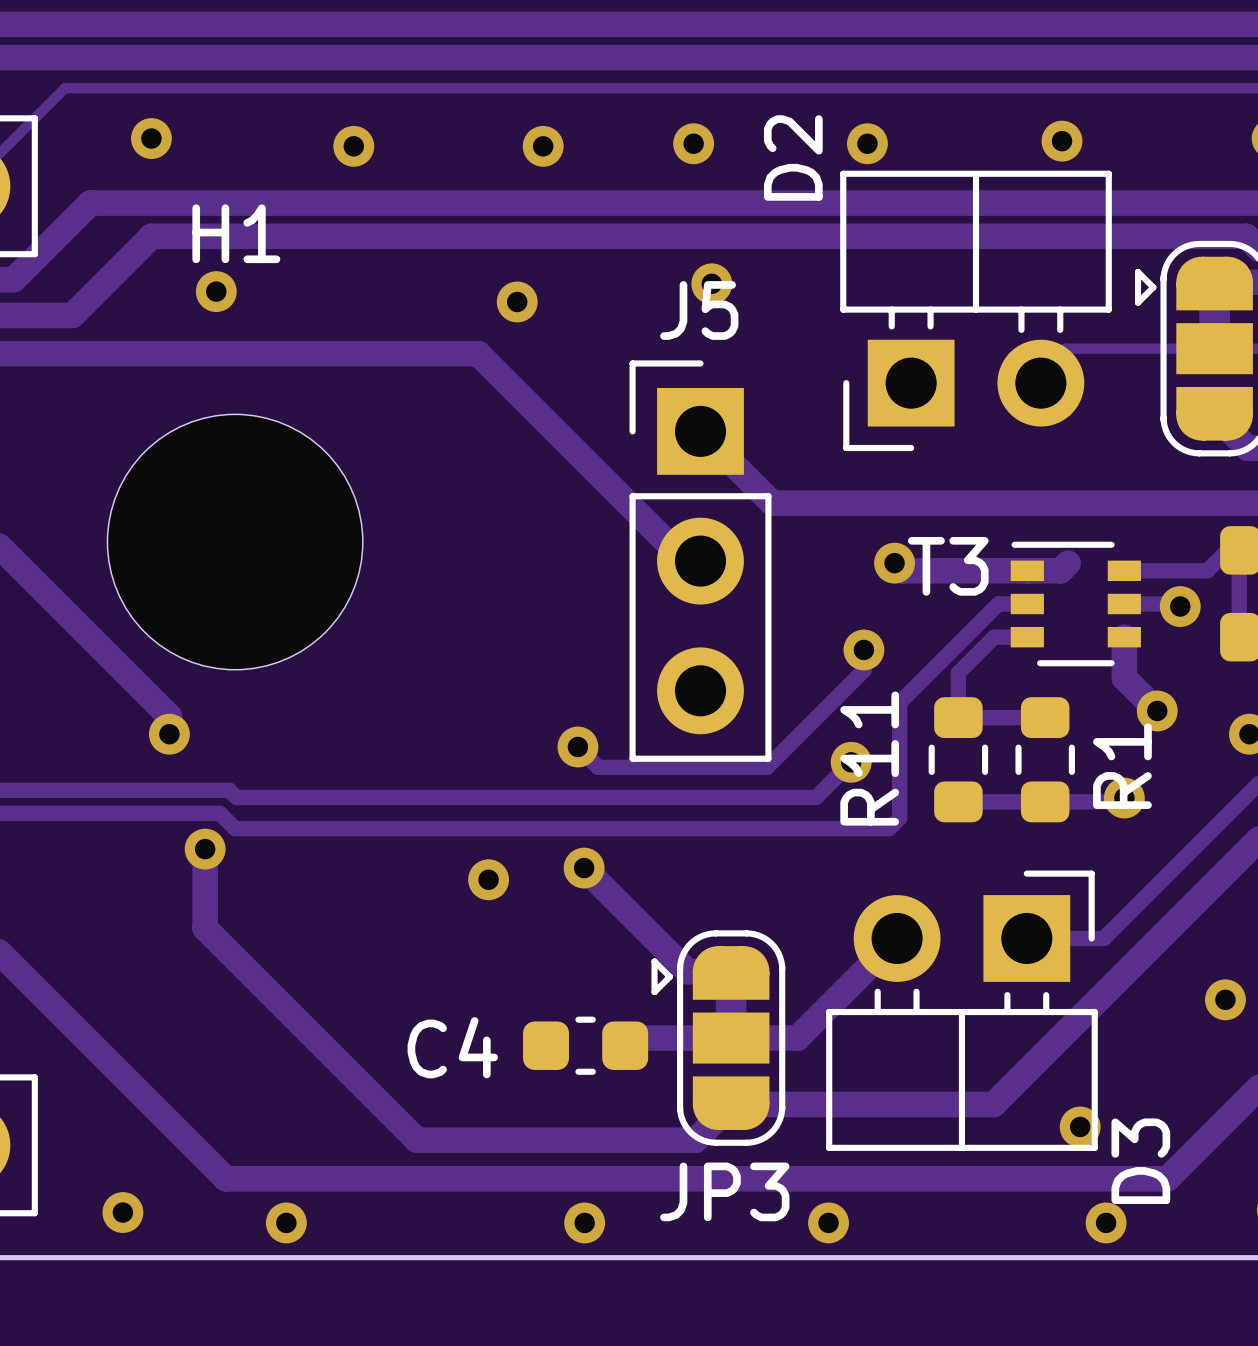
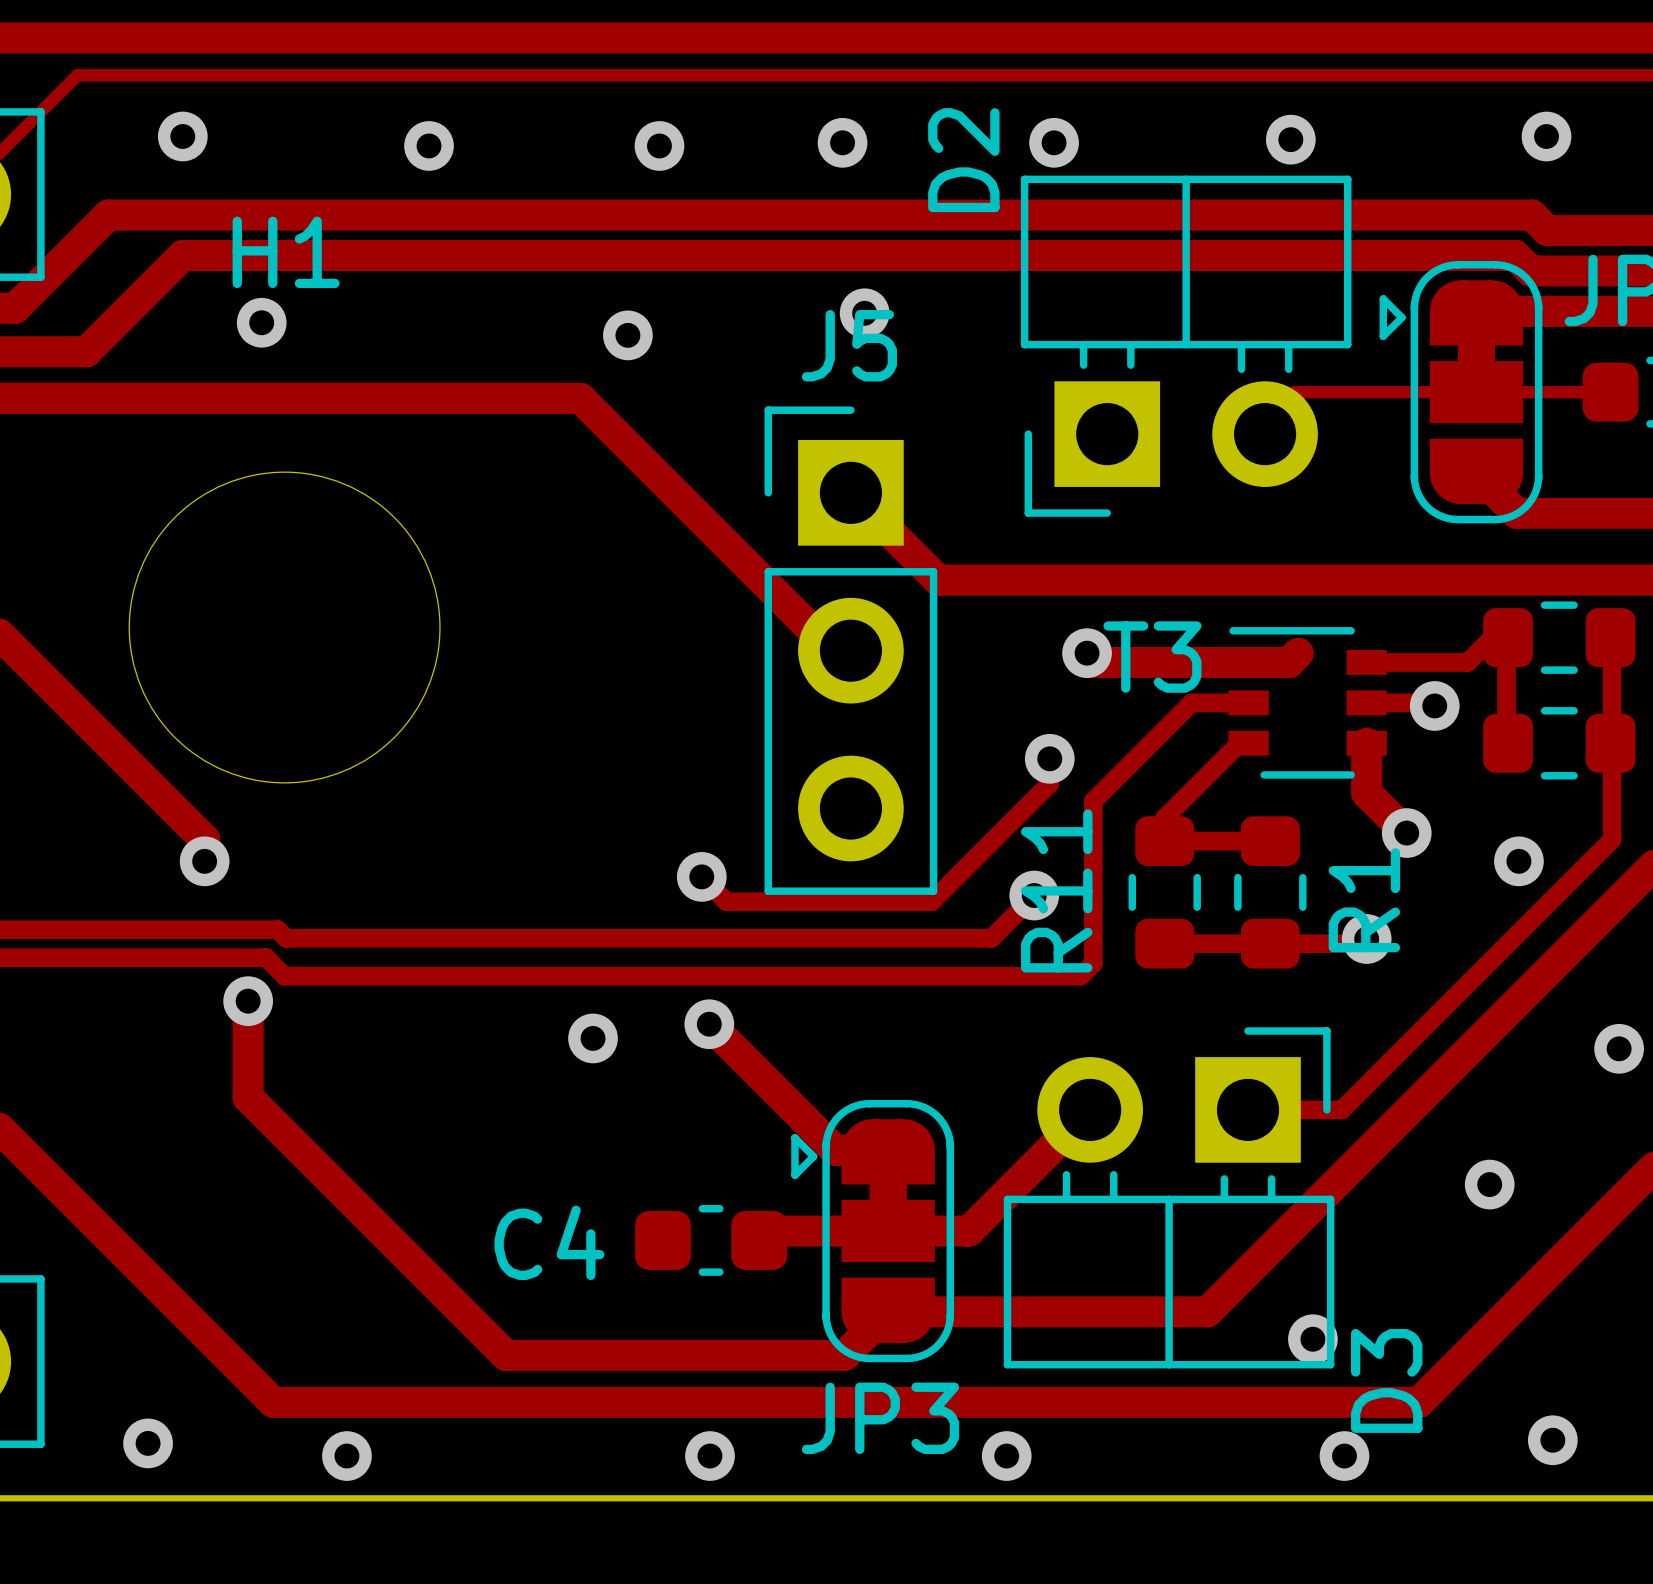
track: (998, 604) (899, 702) -> (1213, 702) (1191, 702) (1093, 801) (1093, 823)
track: (1019, 637) (994, 637) (958, 672) (958, 698) -> (1239, 743) (1164, 818)

